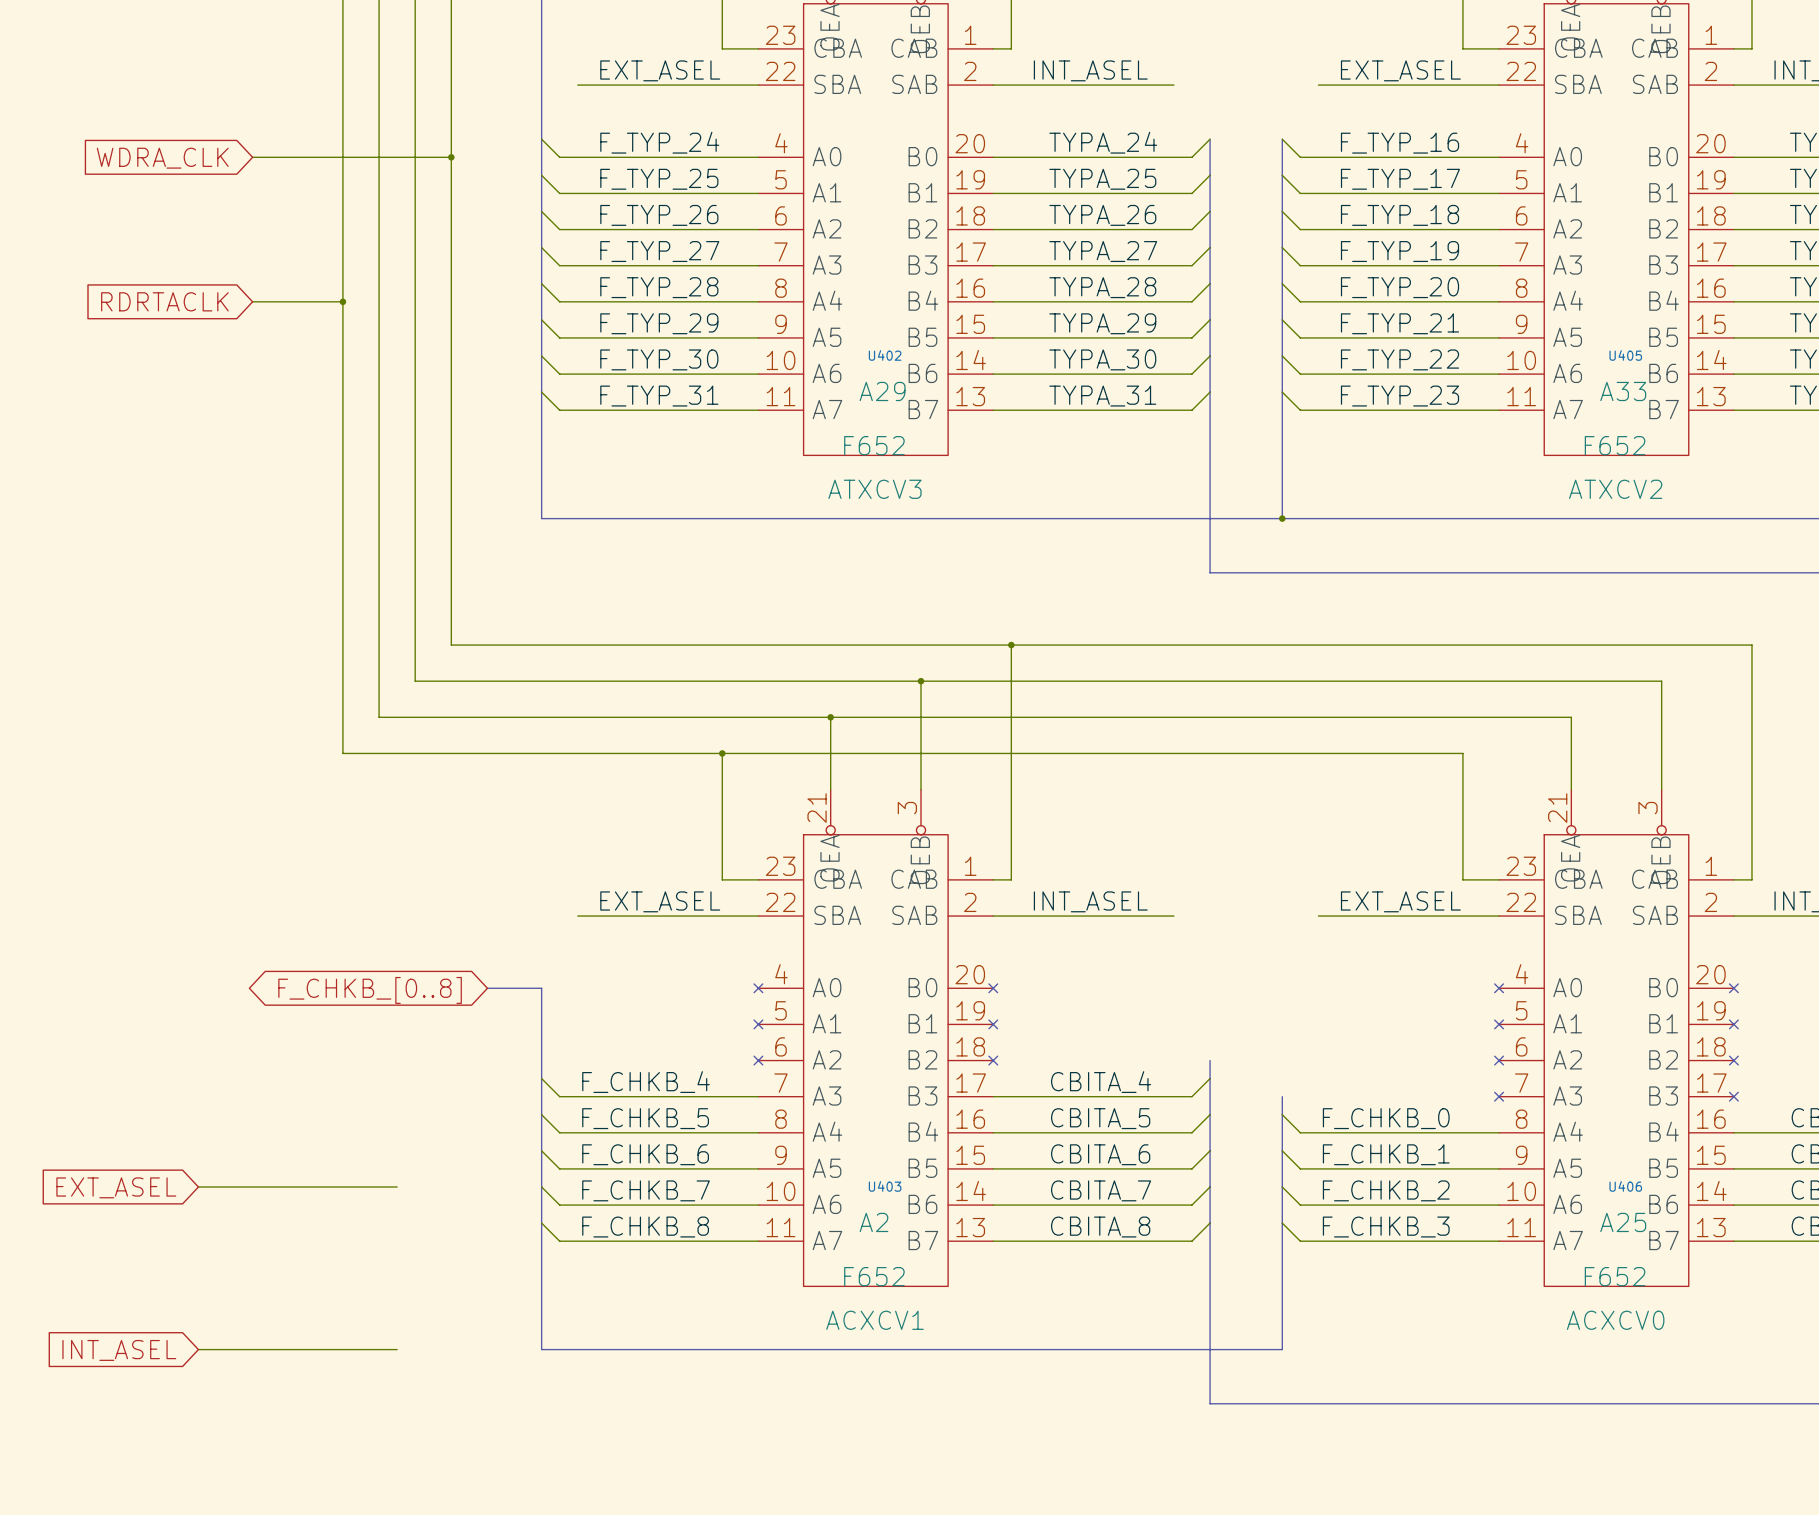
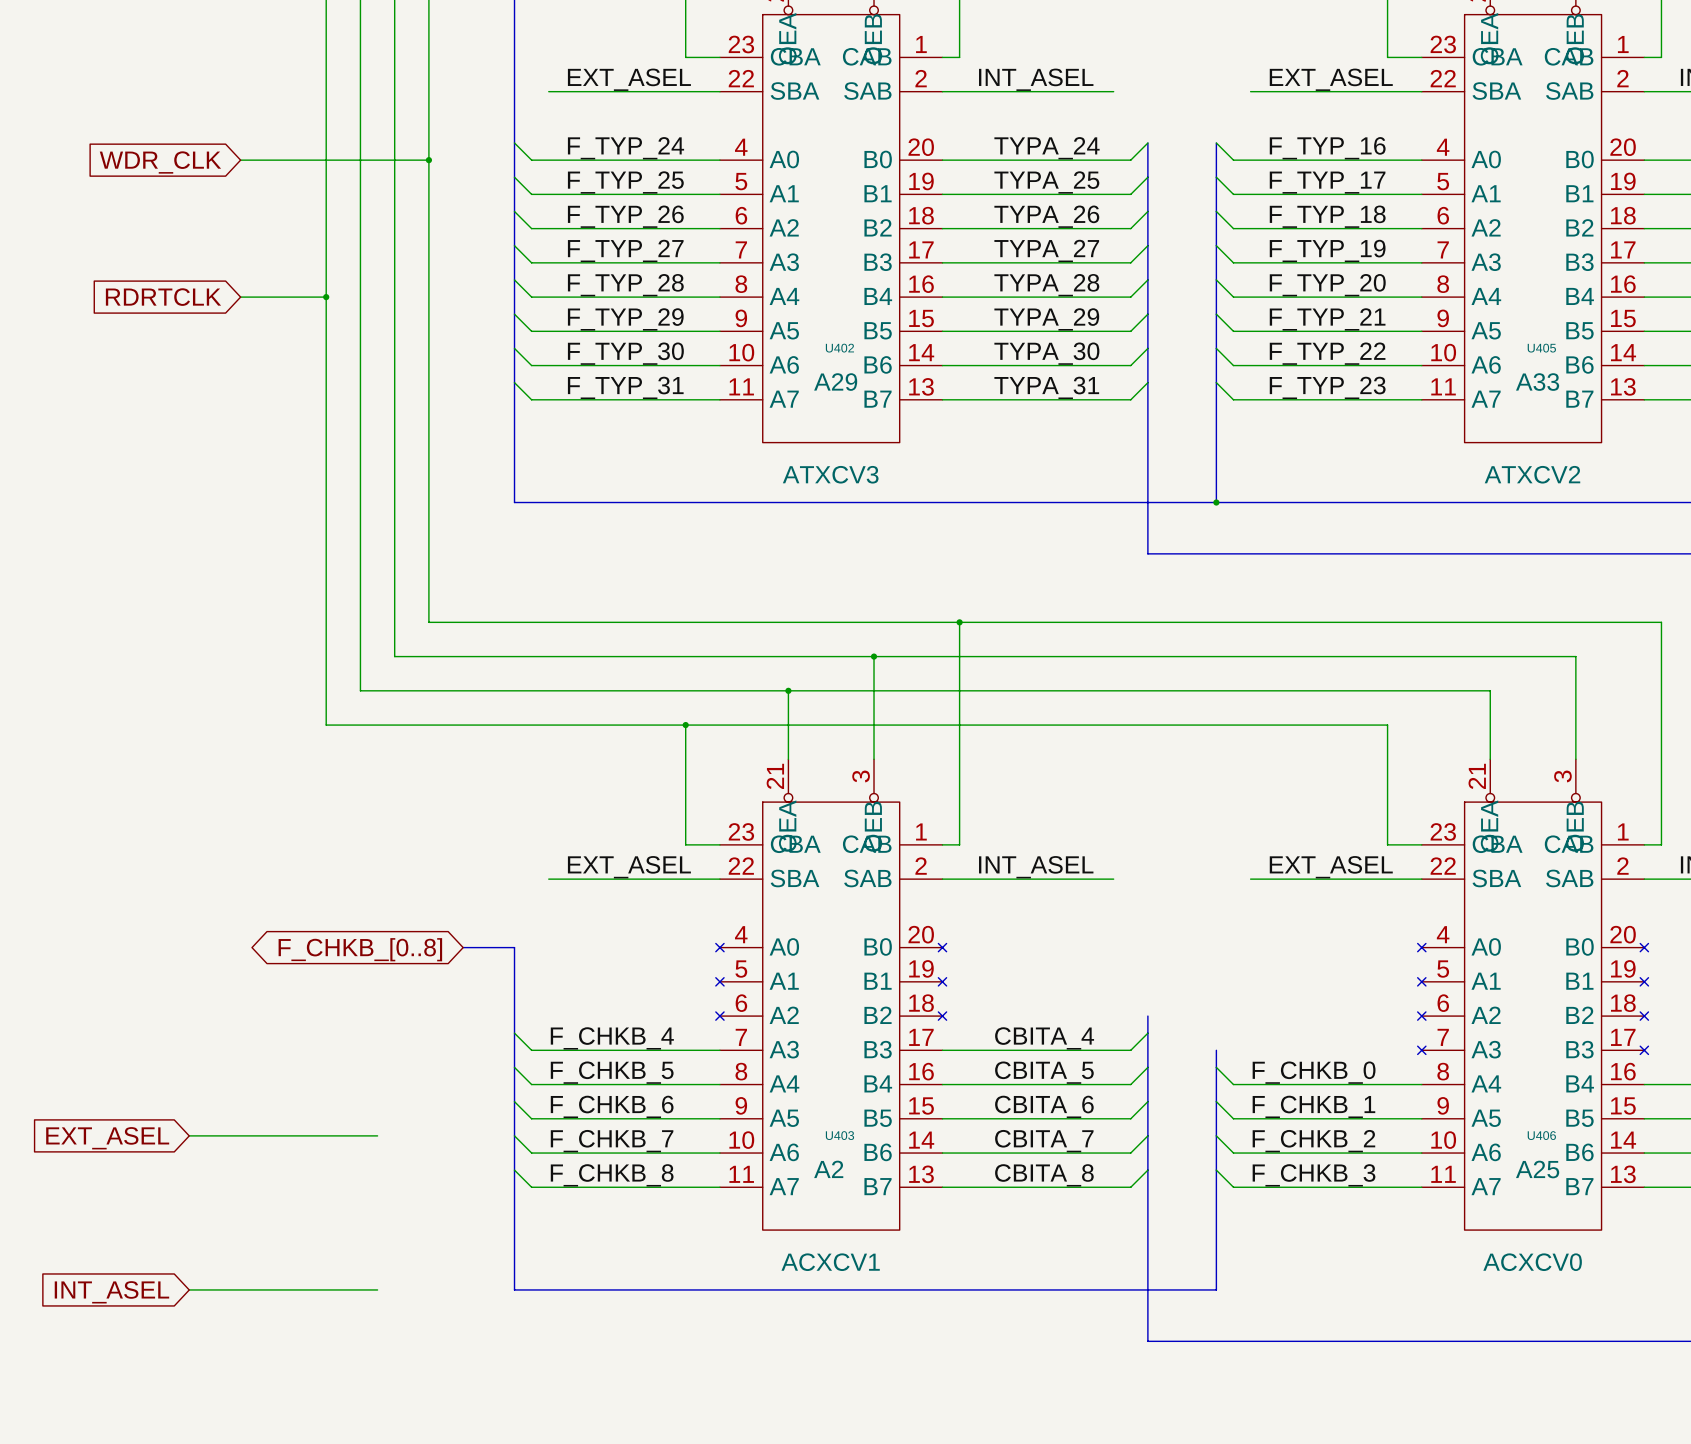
global label: WDRA_CLK (162, 158) -> WDR_CLK (160, 162)
global label: RDRTACLK (164, 301) -> RDRTCLK (163, 297)
U402 value: F652 (874, 445) -> none
U405 value: F652 (1615, 445) -> none
U403 value: F652 (874, 1276) -> none
U406 value: F652 (1615, 1276) -> none

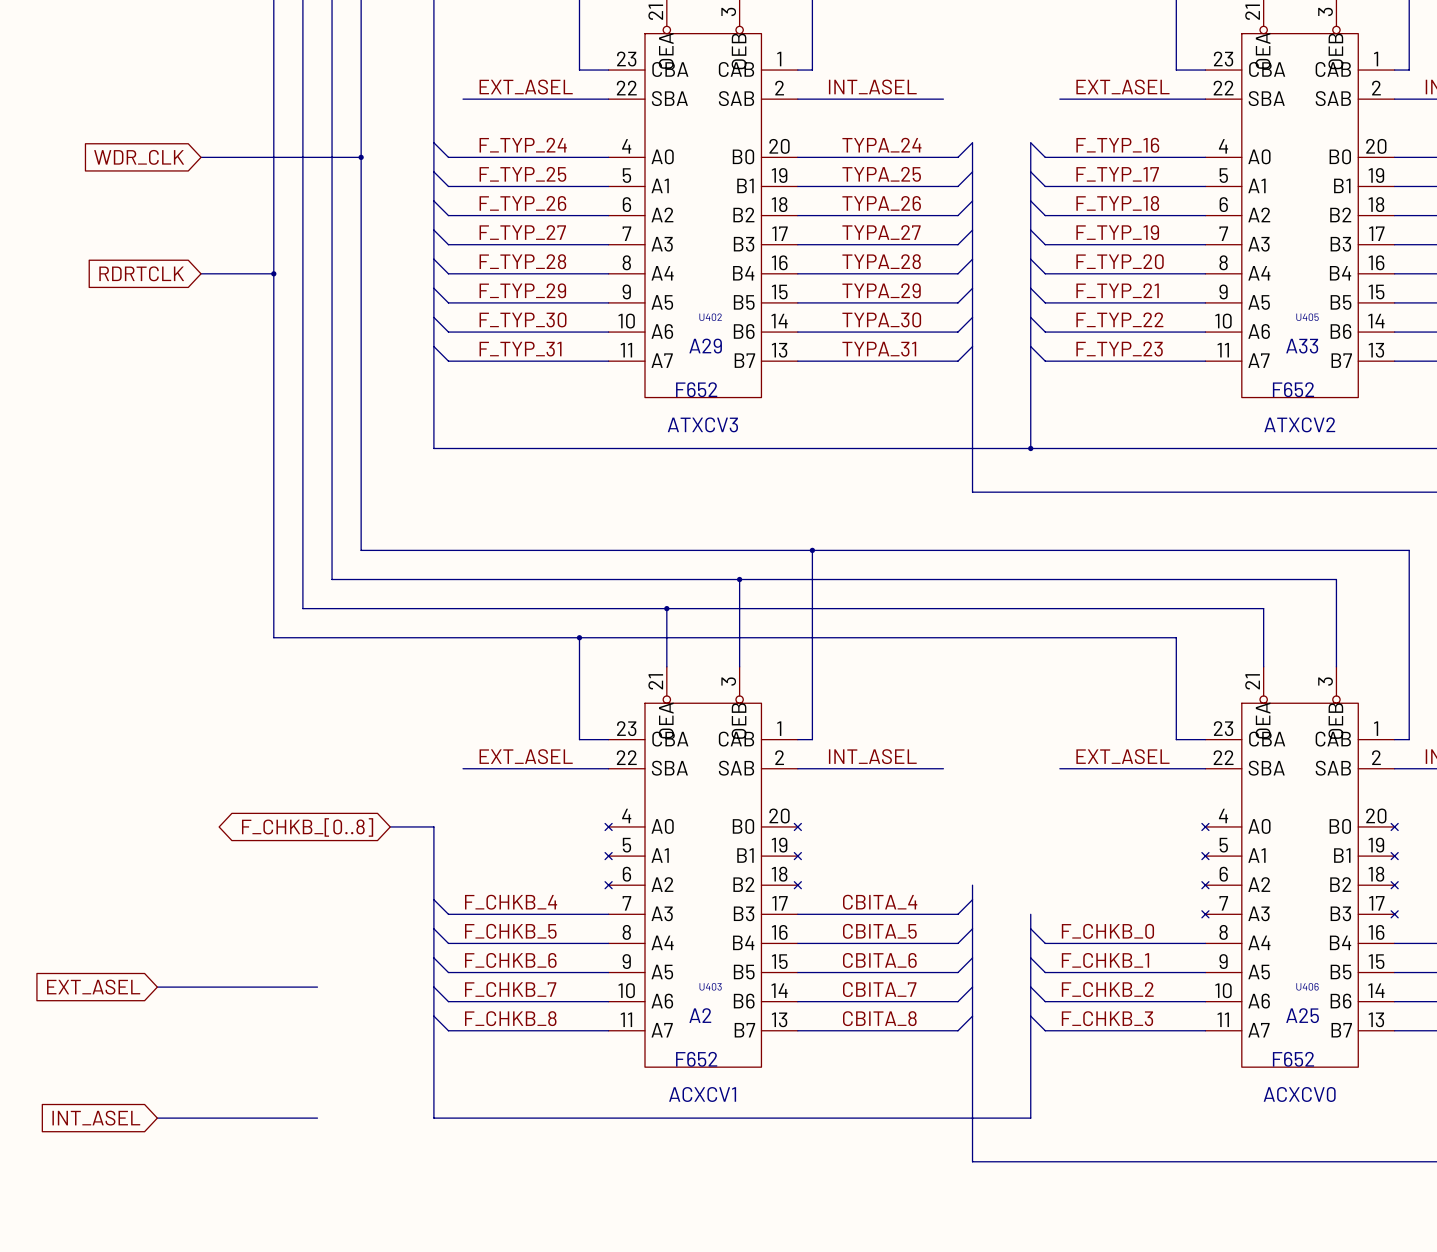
U402 value: none -> F652 (696, 389)
U405 value: none -> F652 (1293, 389)
U403 value: none -> F652 (696, 1059)
U406 value: none -> F652 (1293, 1059)

